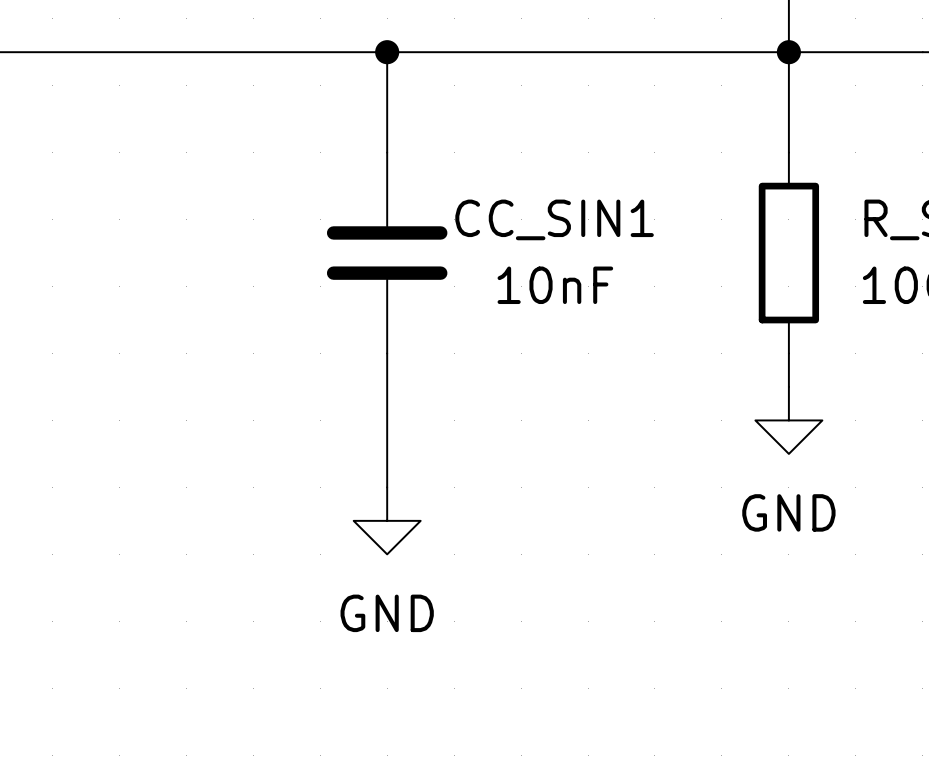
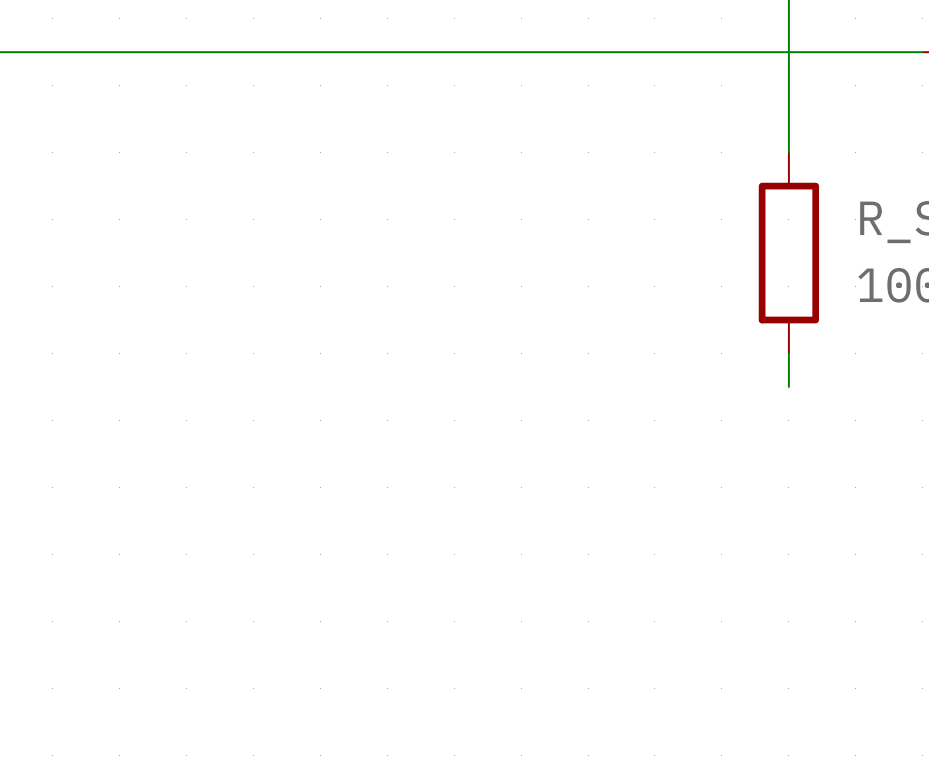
wire: (387, 52) (387, 152) -> none
junction: (387, 52) -> none
junction: (788, 52) -> none
CC_SIN1: 10nF (387, 253) -> none
wire: (387, 353) (387, 487) -> none
power symbol: GND (788, 420) -> none
power symbol: GND (387, 520) -> none

